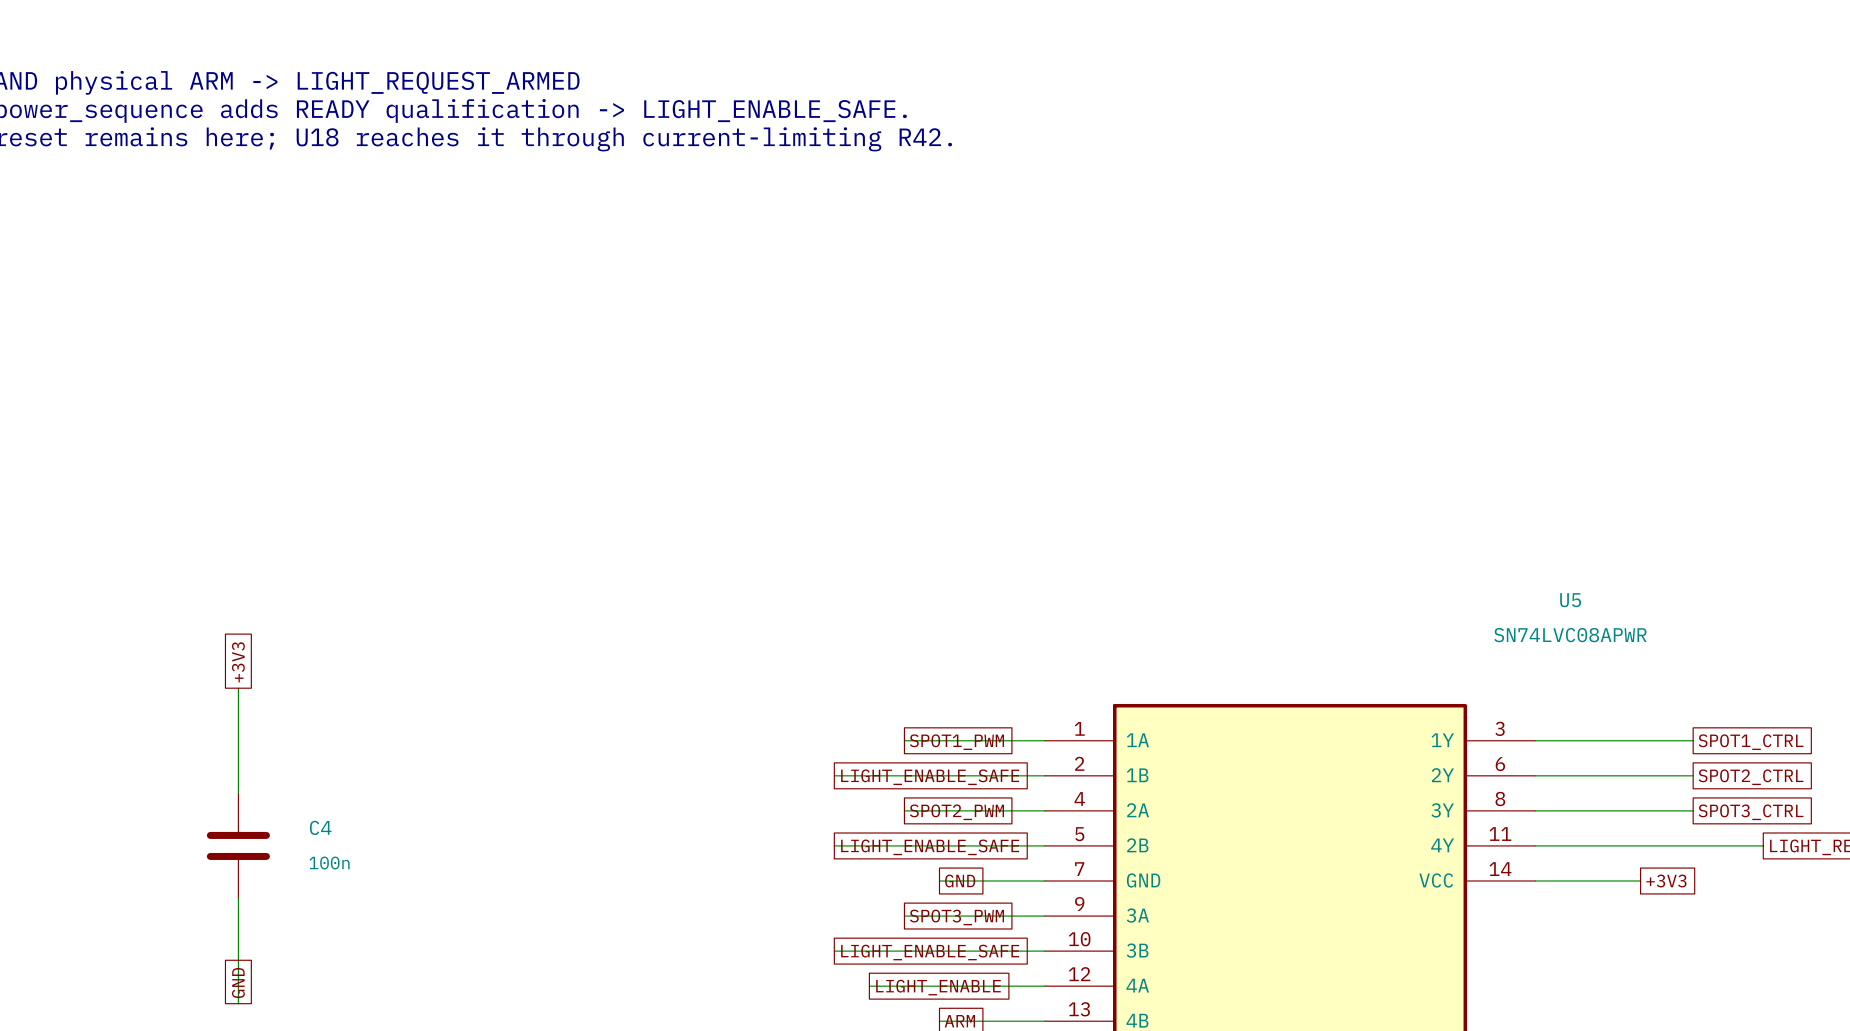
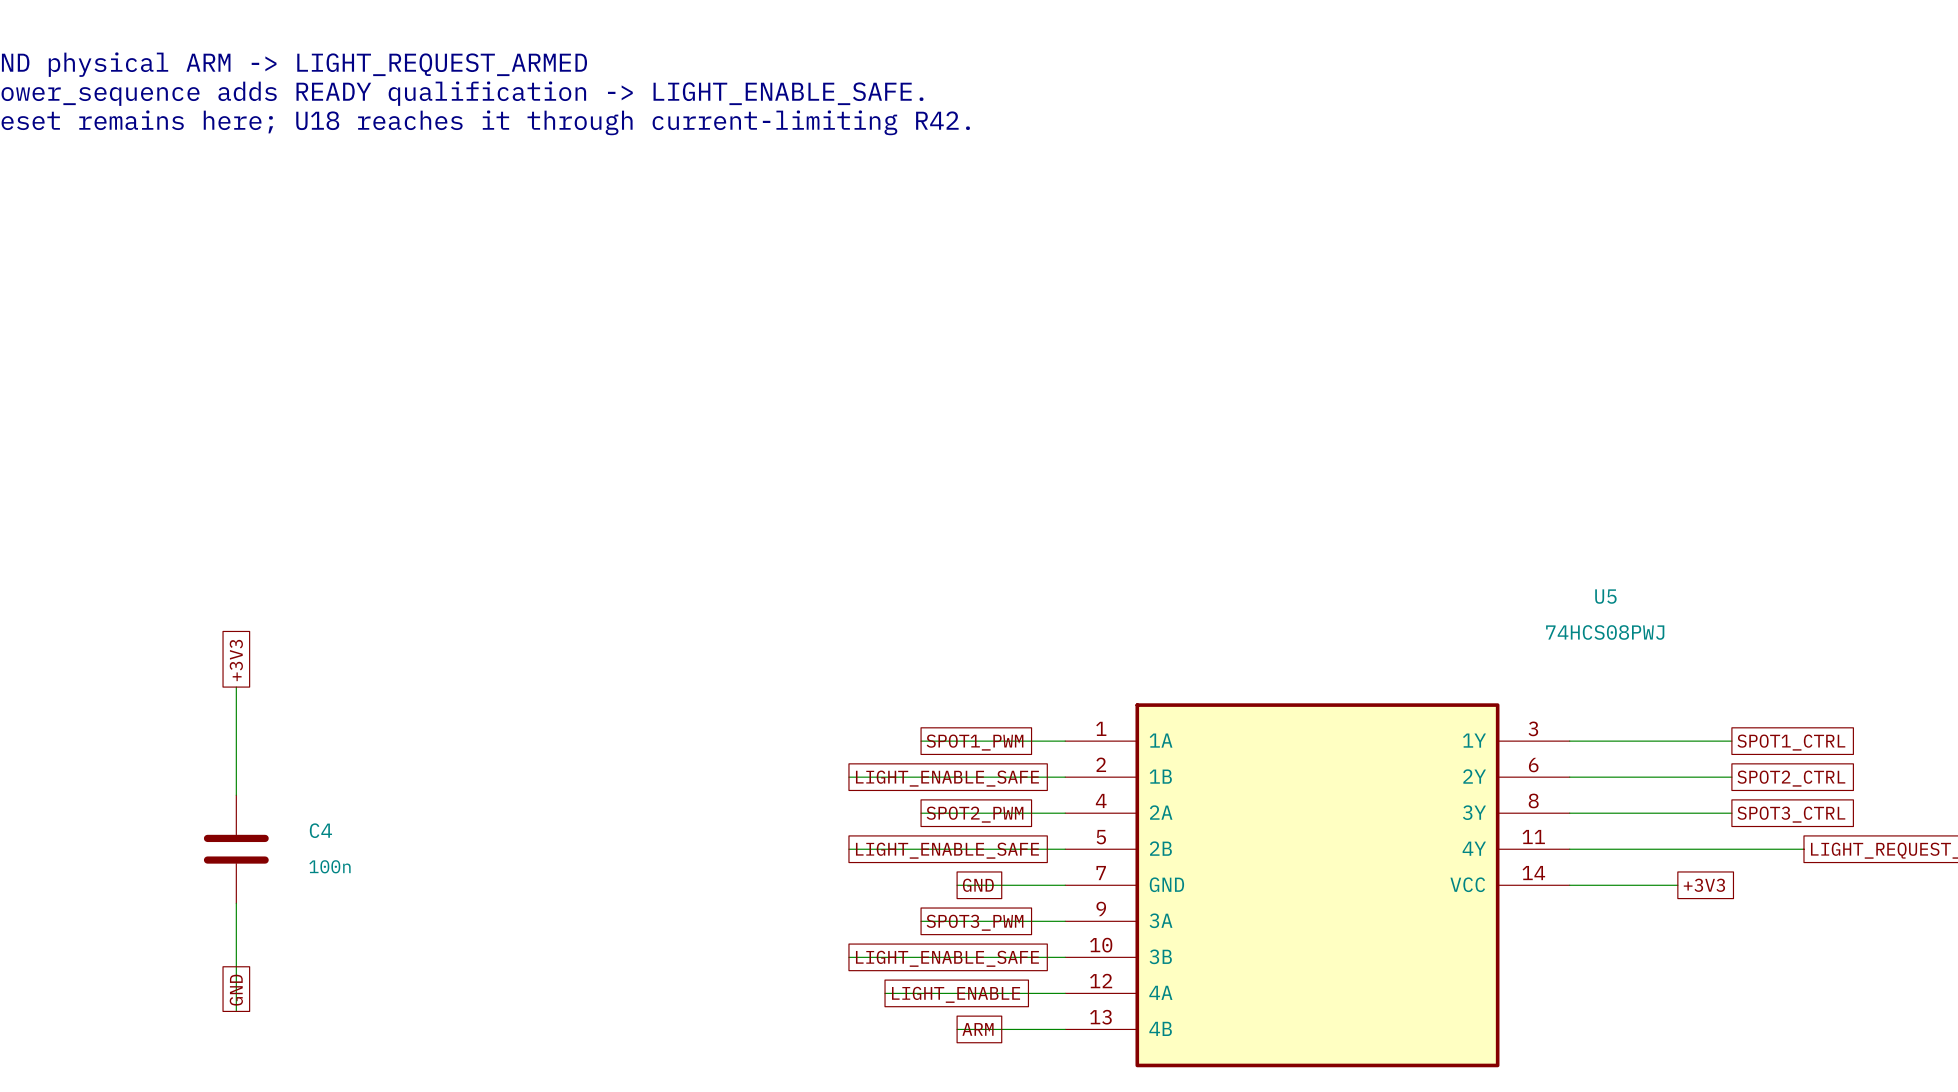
U5 value: SN74LVC08APWR (1570, 635) -> 74HCS08PWJ (1605, 632)

